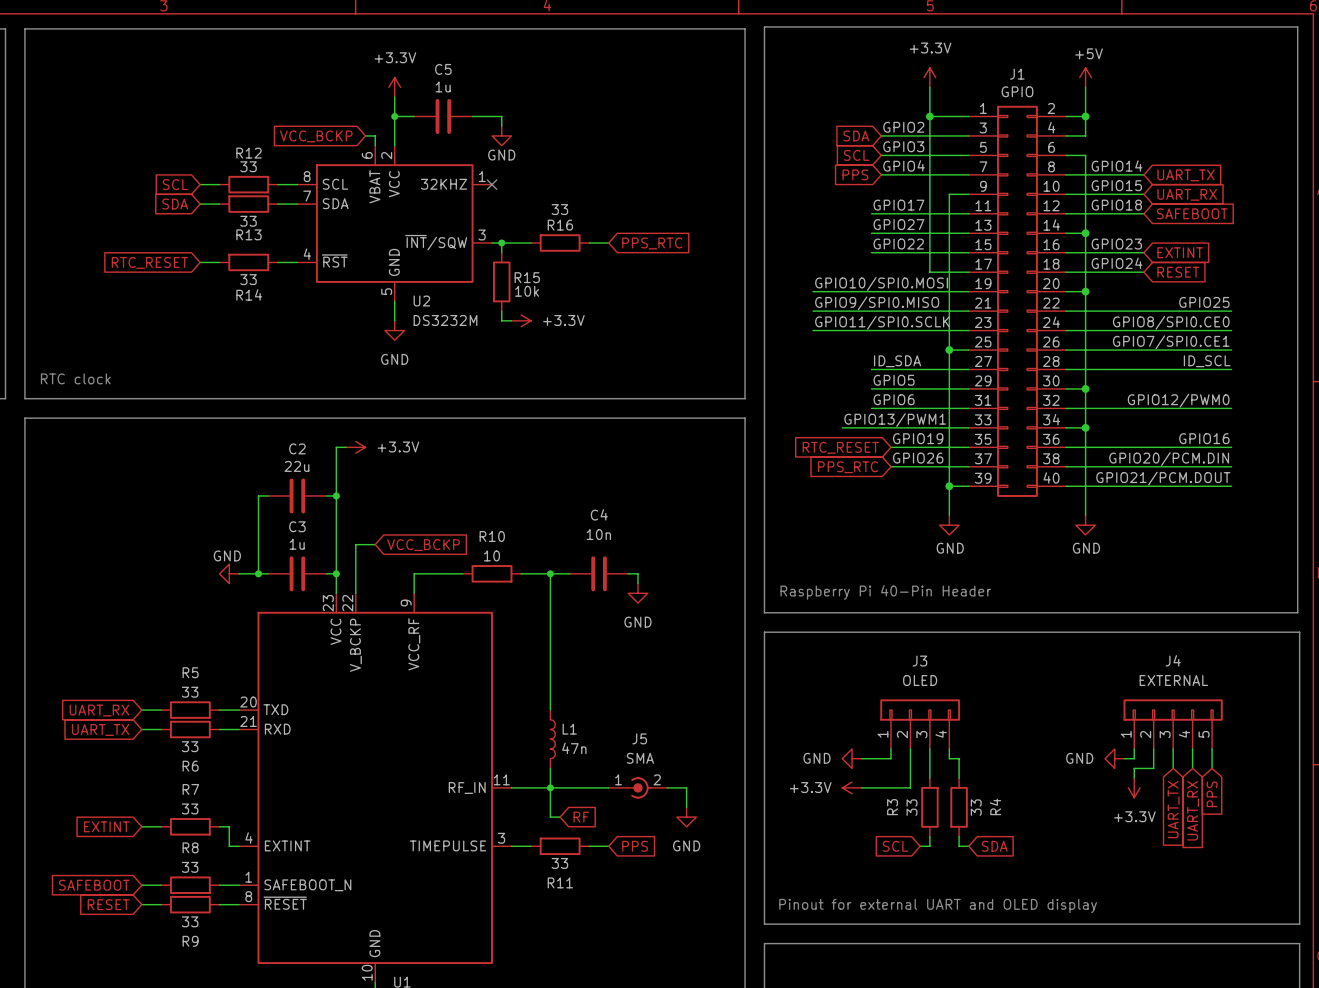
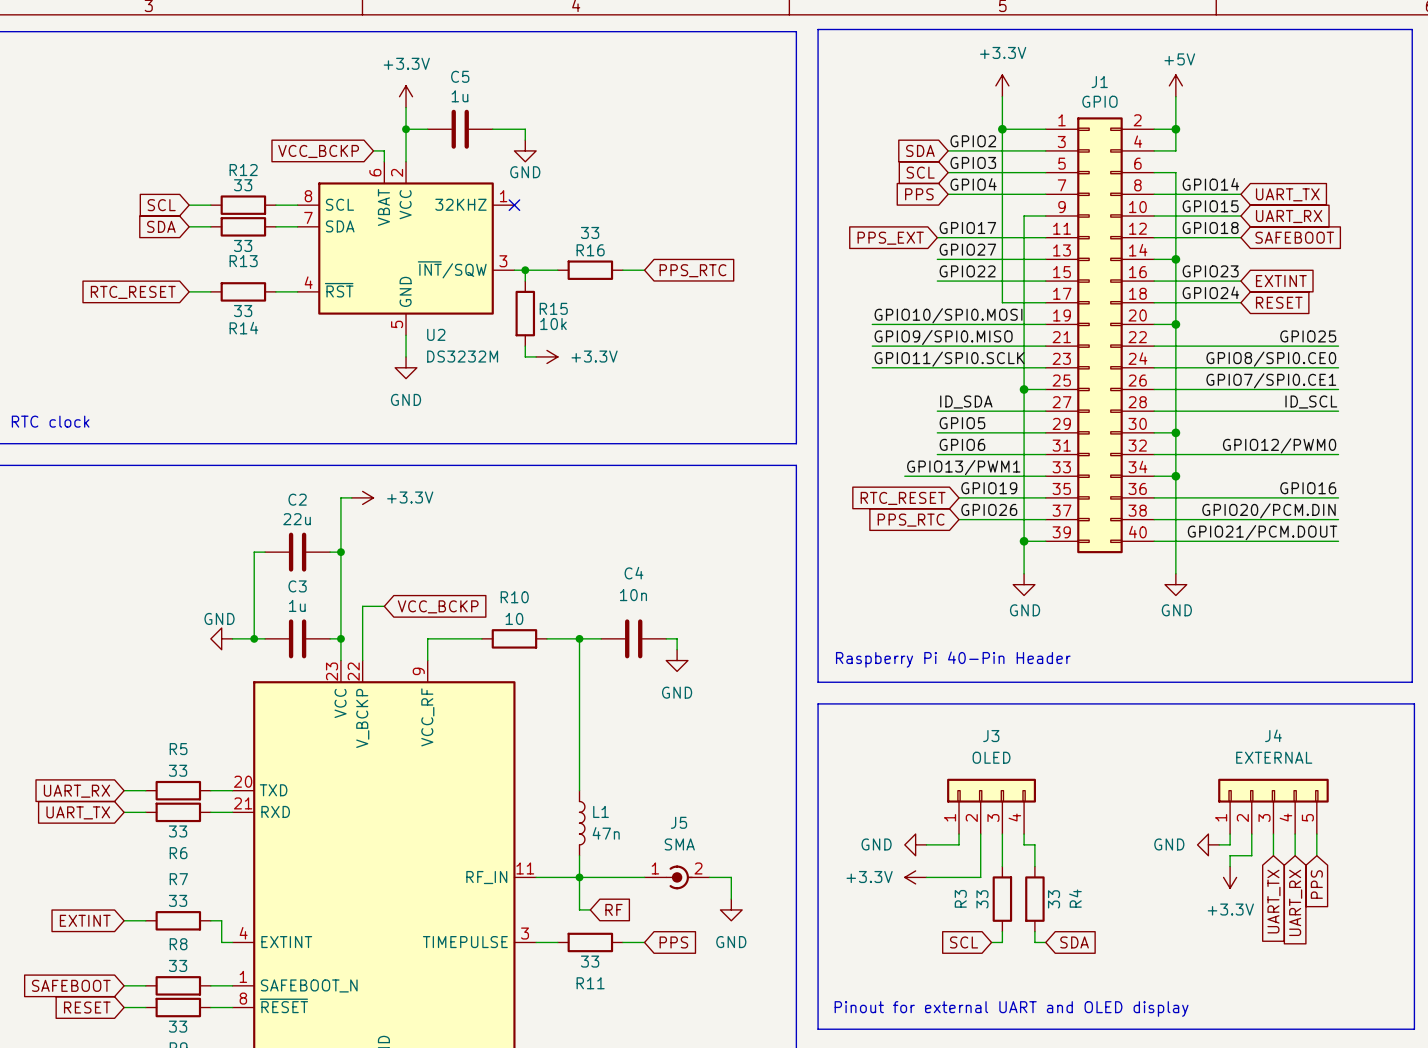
global label: none -> PPS_EXT (890, 238)

